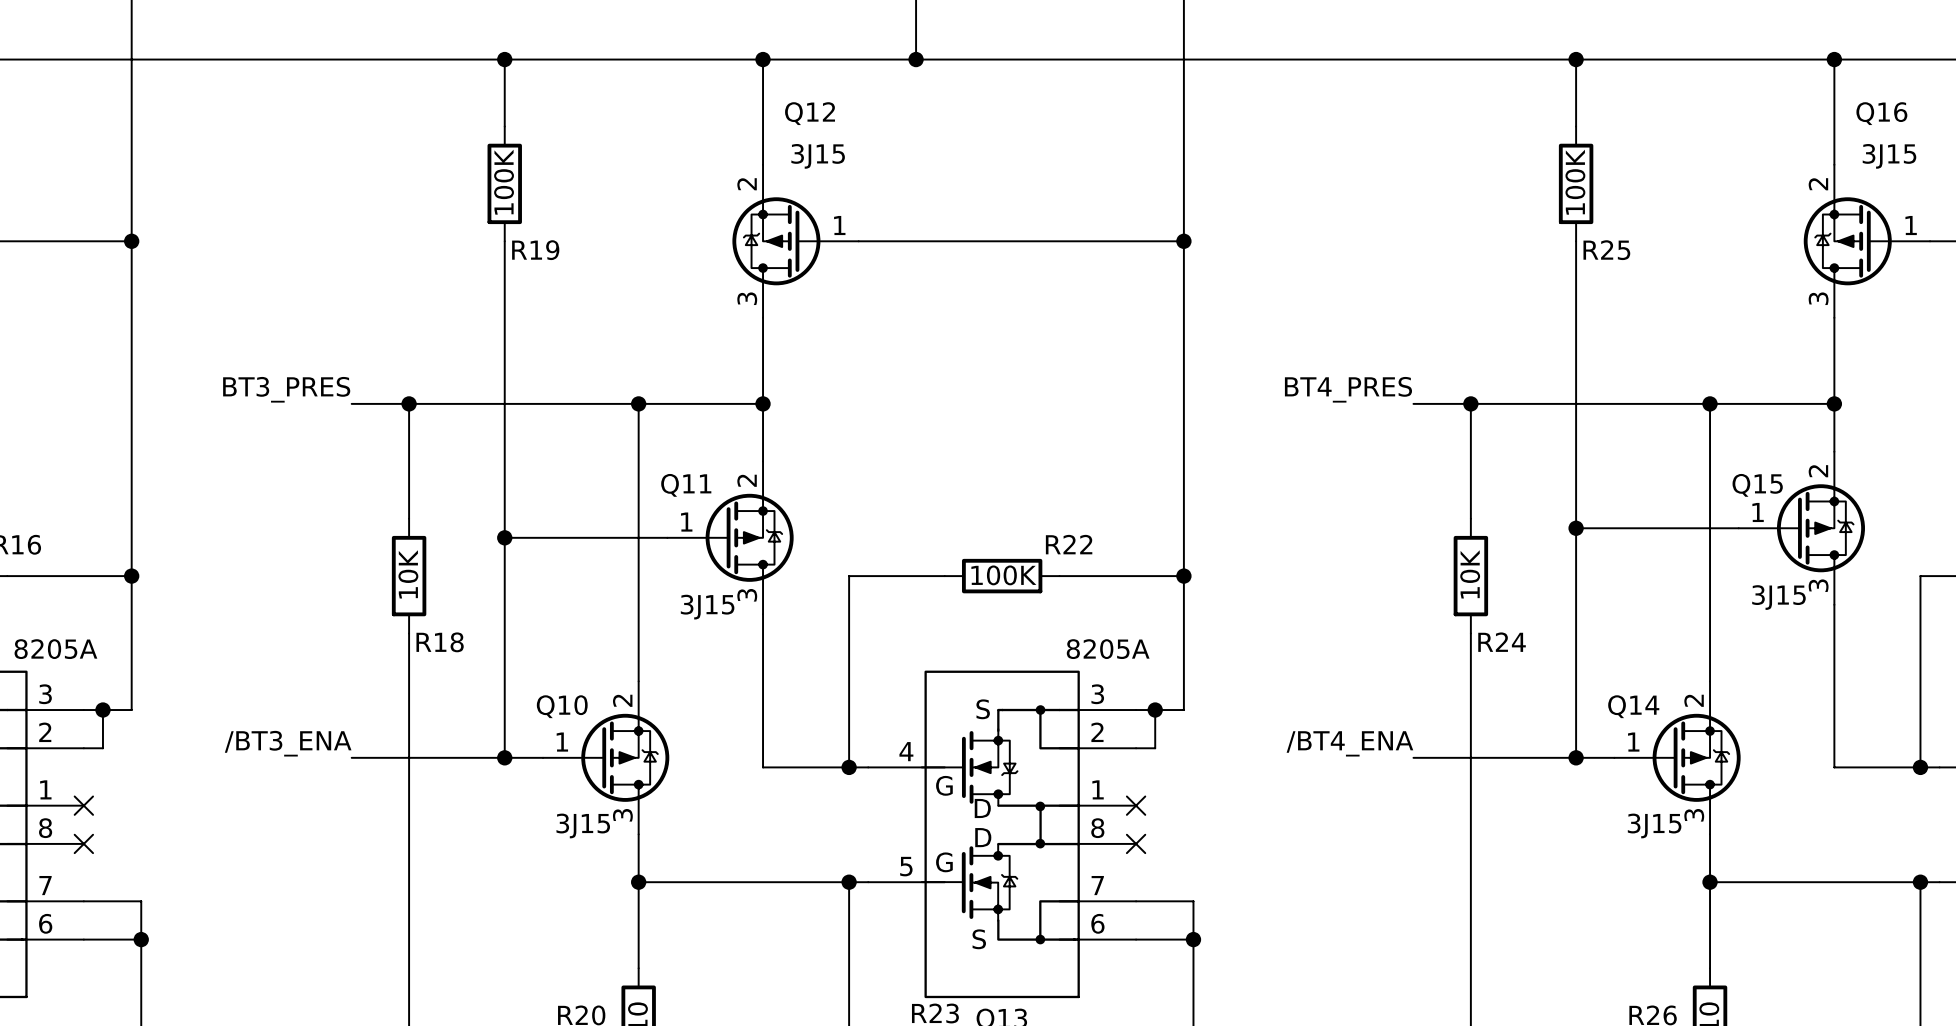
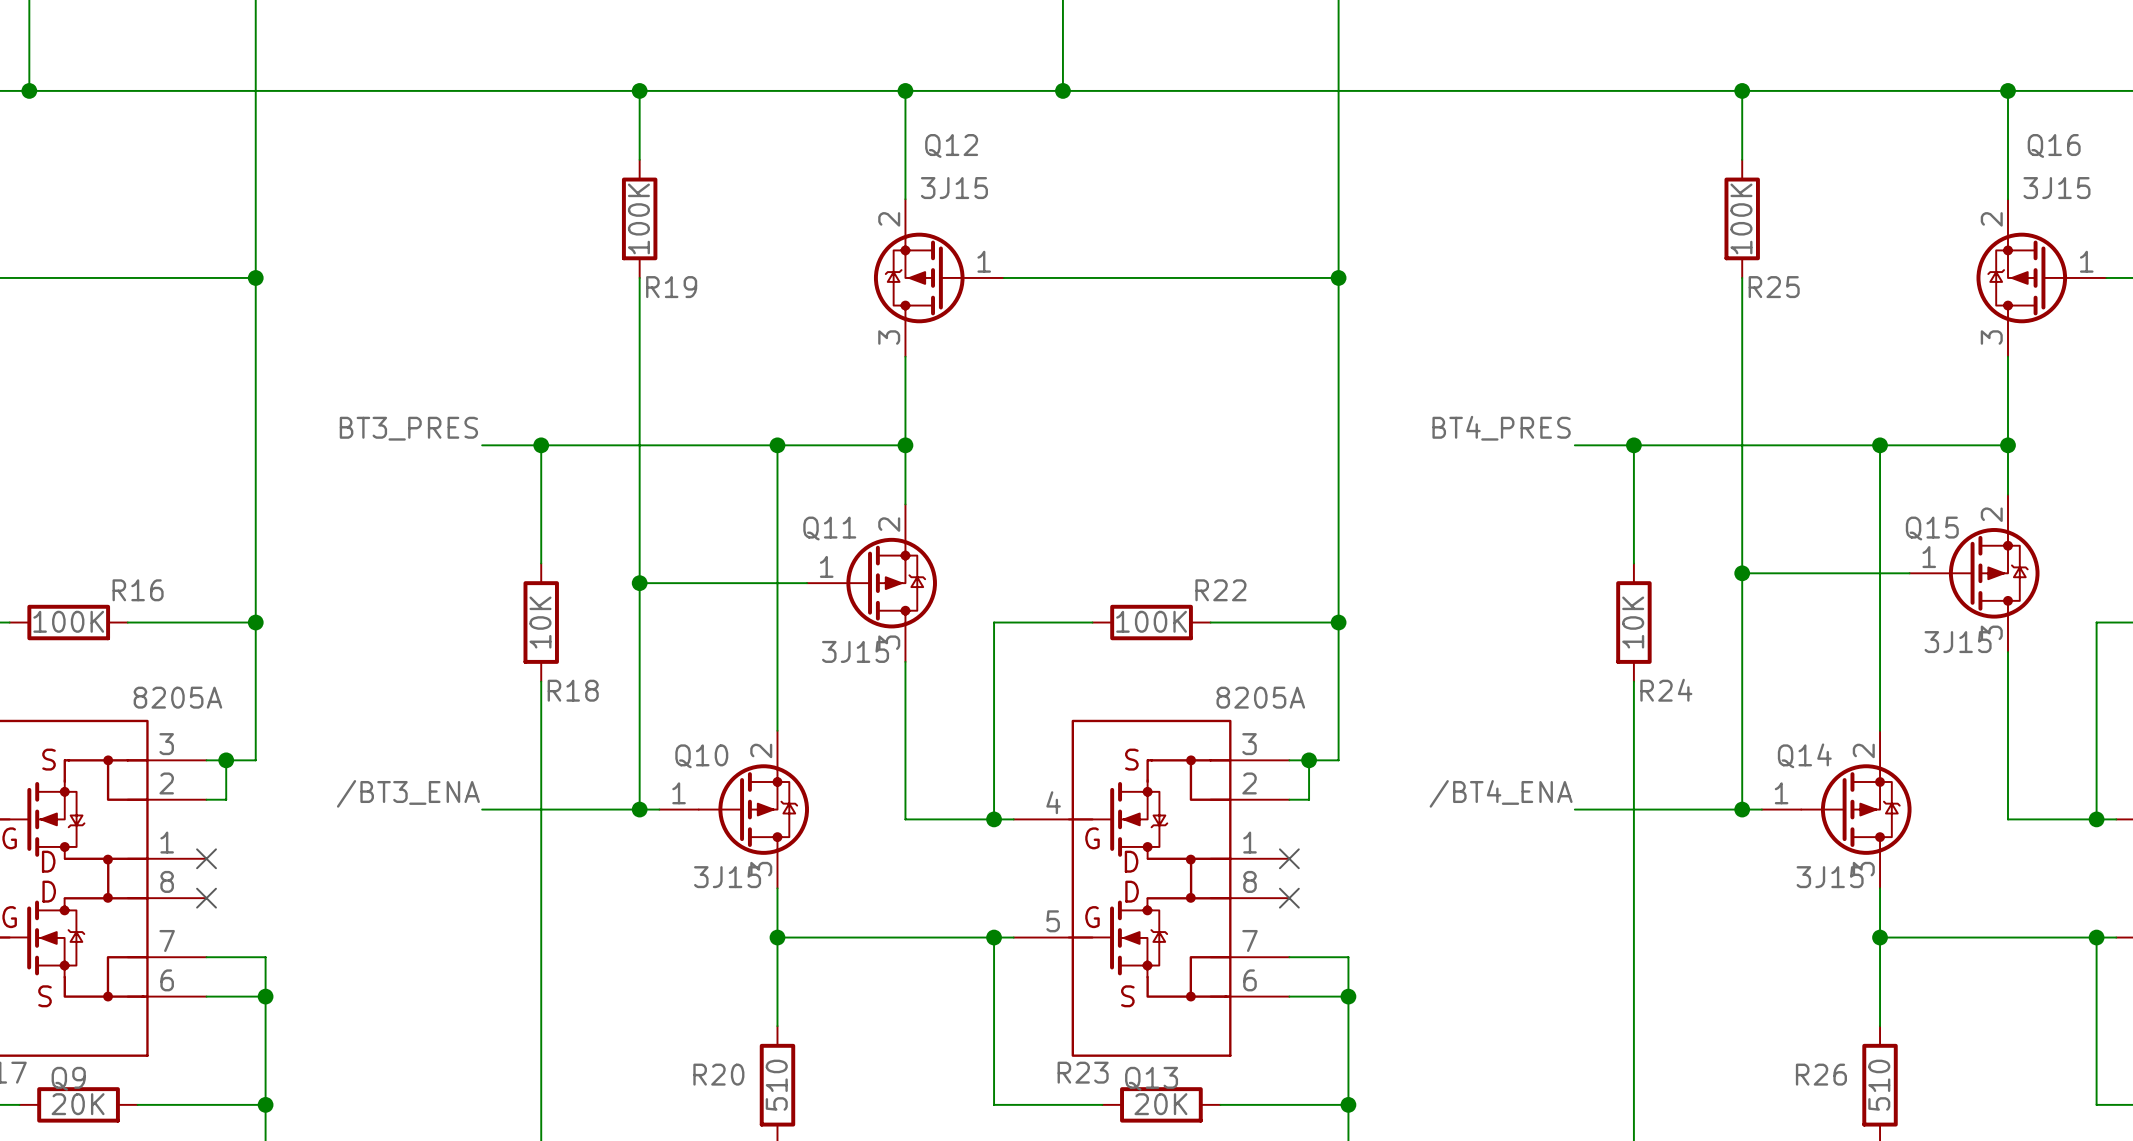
Q10 symbol: [543, 681, 670, 835] -> [659, 730, 809, 889]
Q14 symbol: [1614, 681, 1741, 835] -> [1761, 730, 1912, 889]

